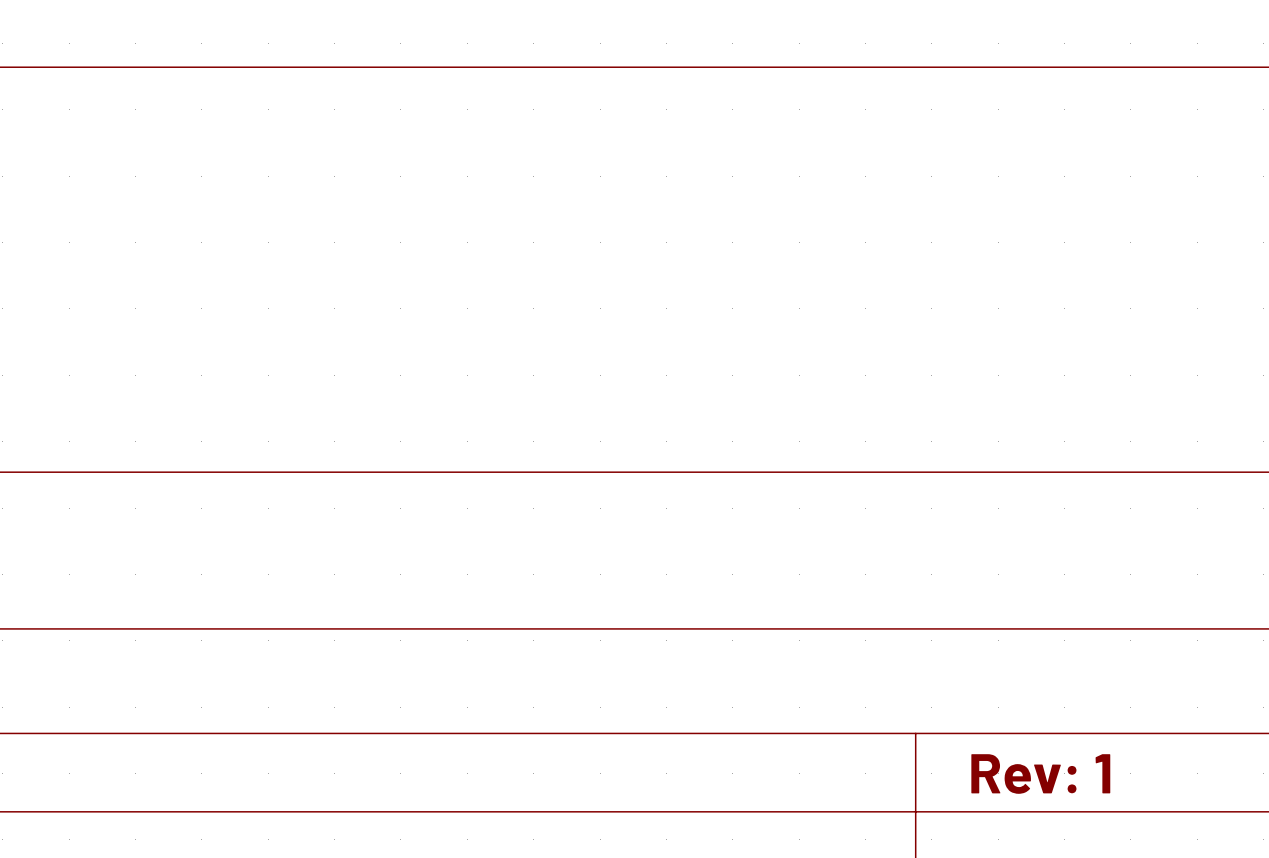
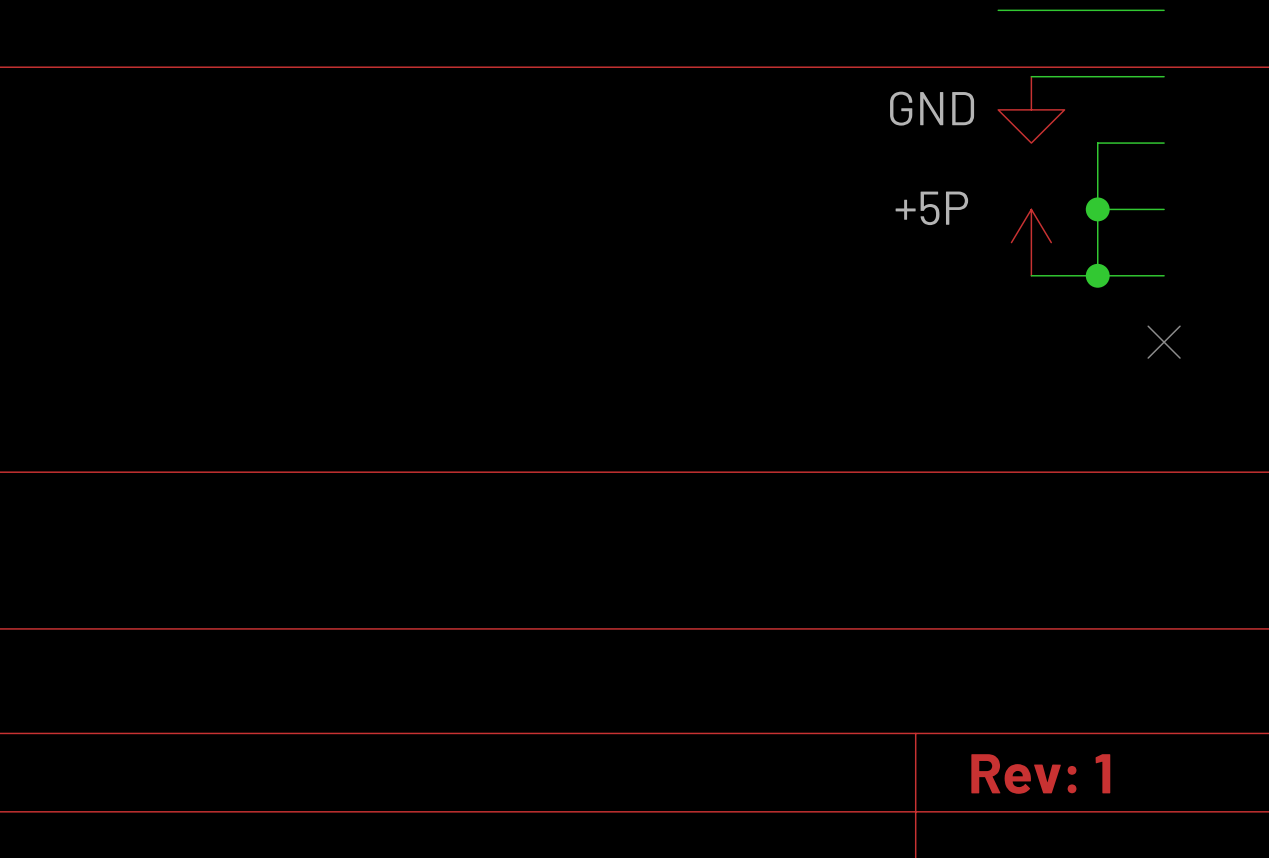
wire: none -> (998, 10) (1164, 10)
wire: none -> (1031, 76) (1164, 76)
power symbol: none -> GND (1031, 109)
wire: none -> (1164, 143) (1097, 143) (1097, 275)
wire: none -> (1097, 209) (1164, 209)
junction: none -> (1097, 209)
power symbol: none -> +5P (1031, 242)
wire: none -> (1031, 275) (1164, 275)
junction: none -> (1097, 275)
no-connect mark: none -> (1164, 342)

